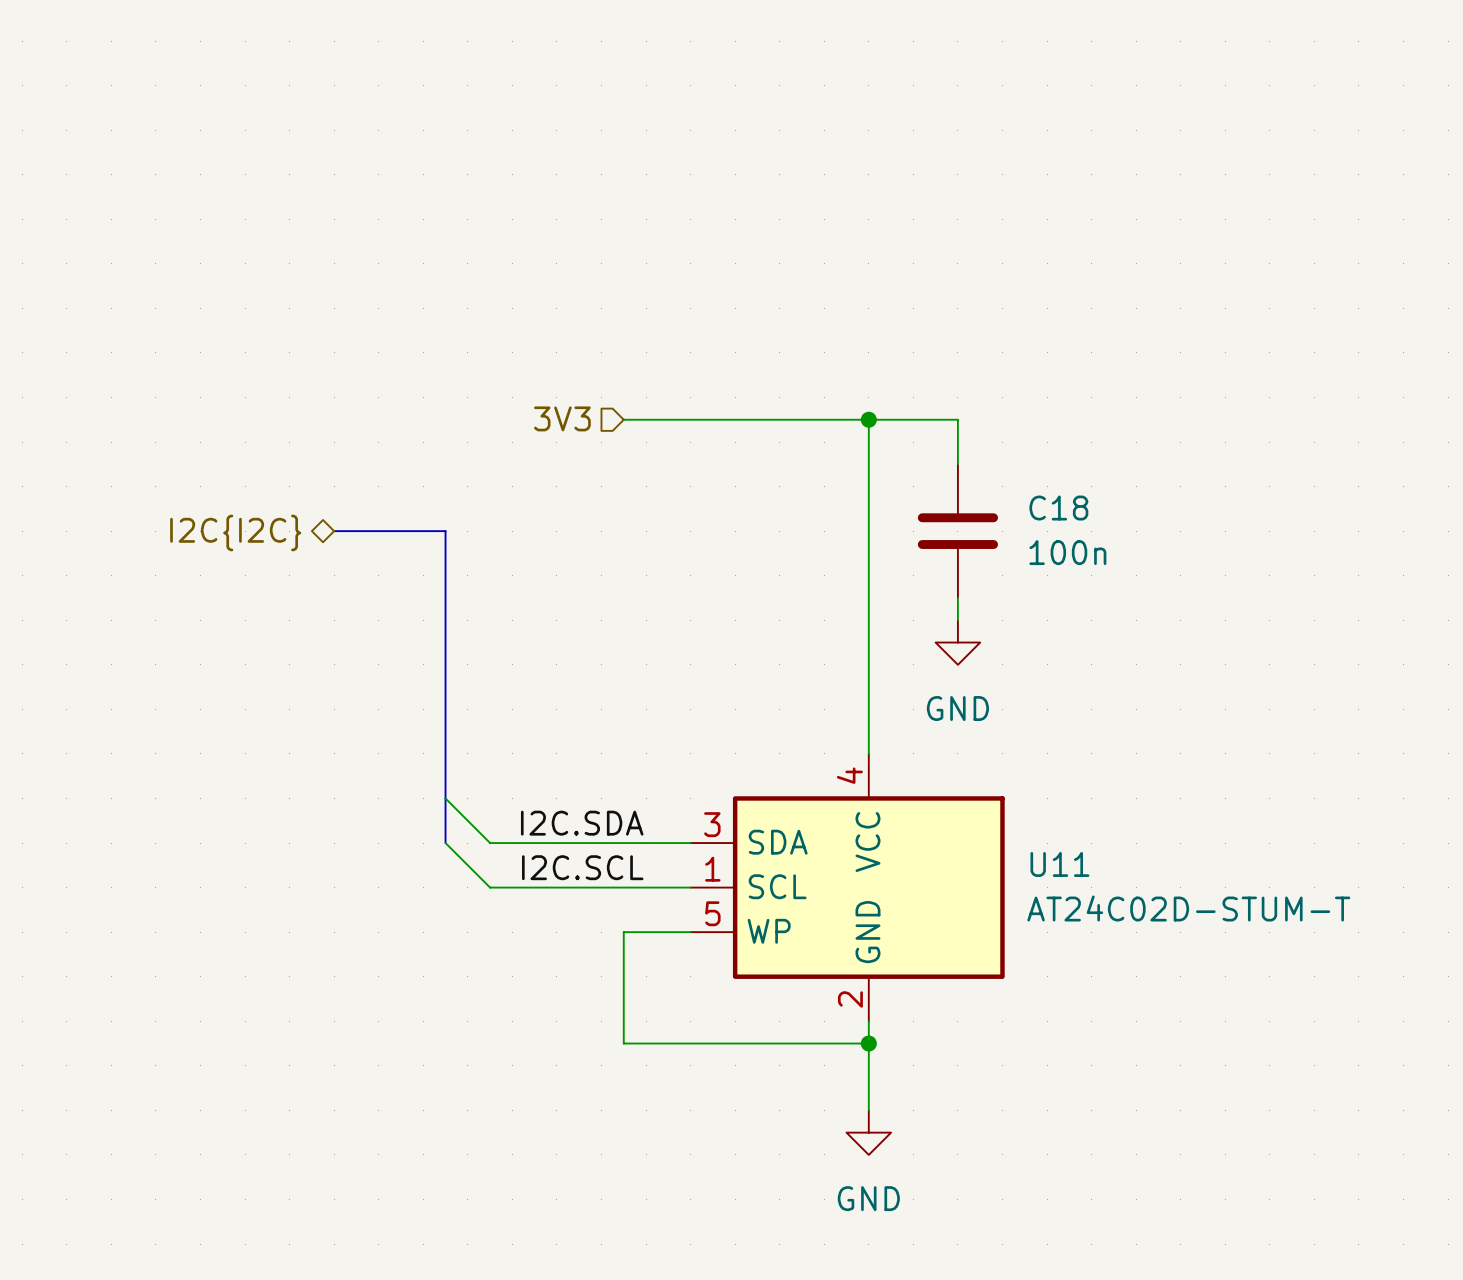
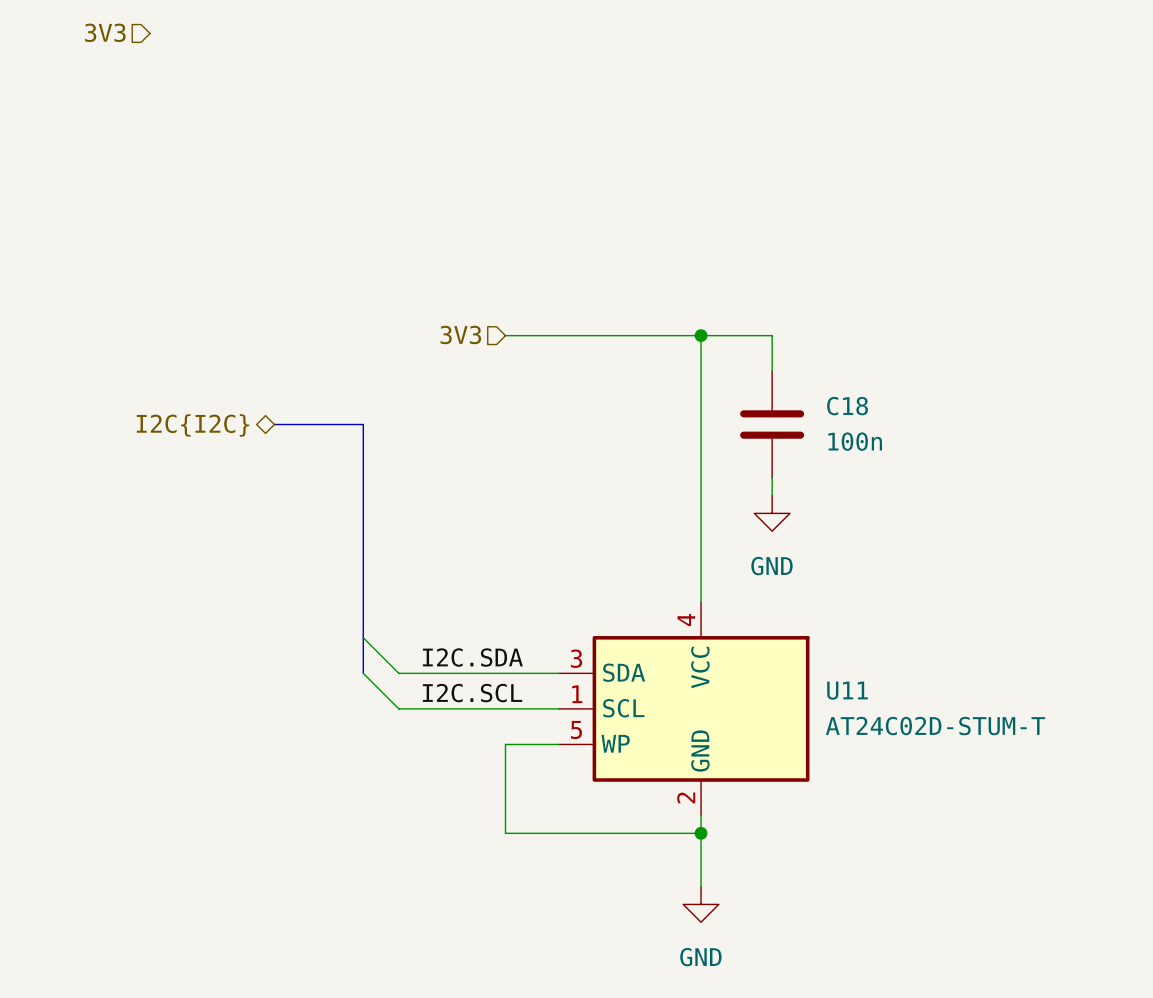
hierarchical label: none -> 3V3 (105, 32)

